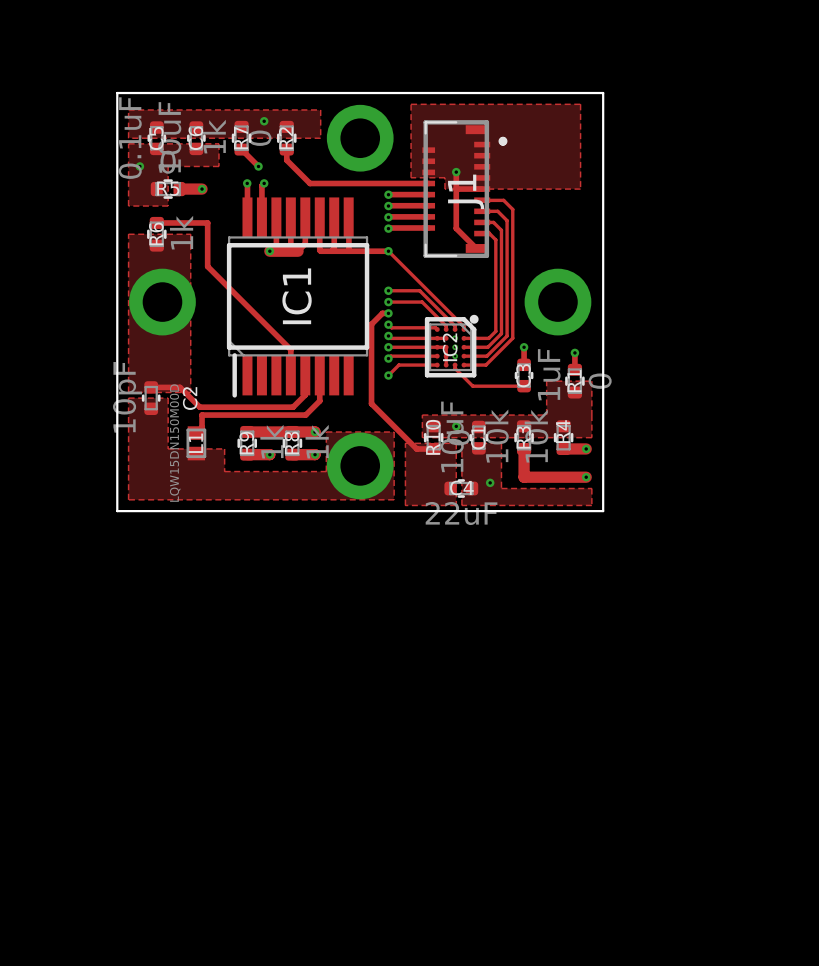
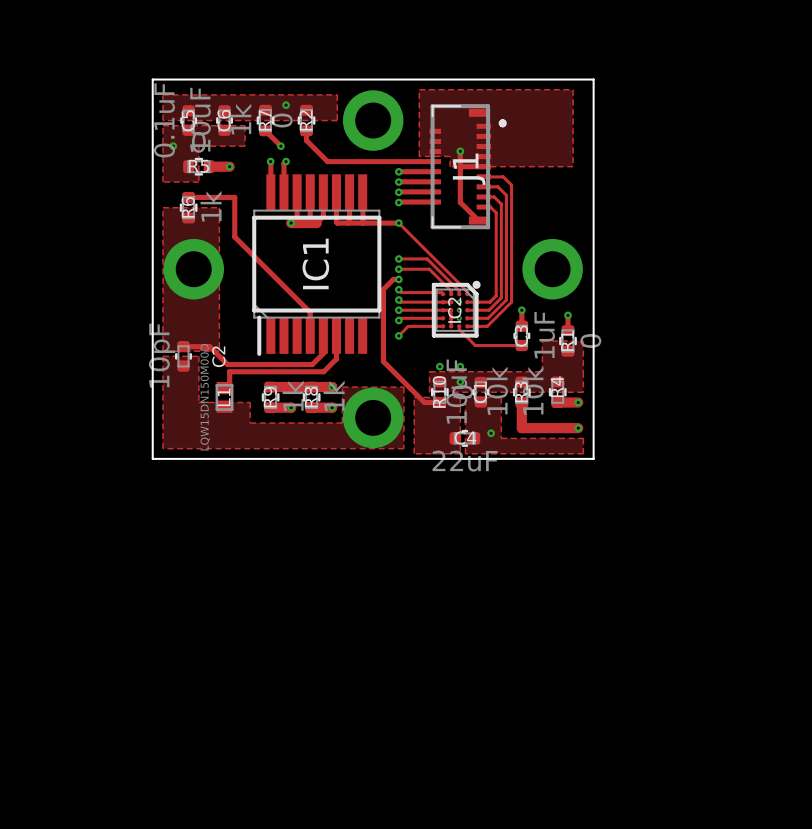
via: none -> (439, 366)
via: none -> (460, 366)

